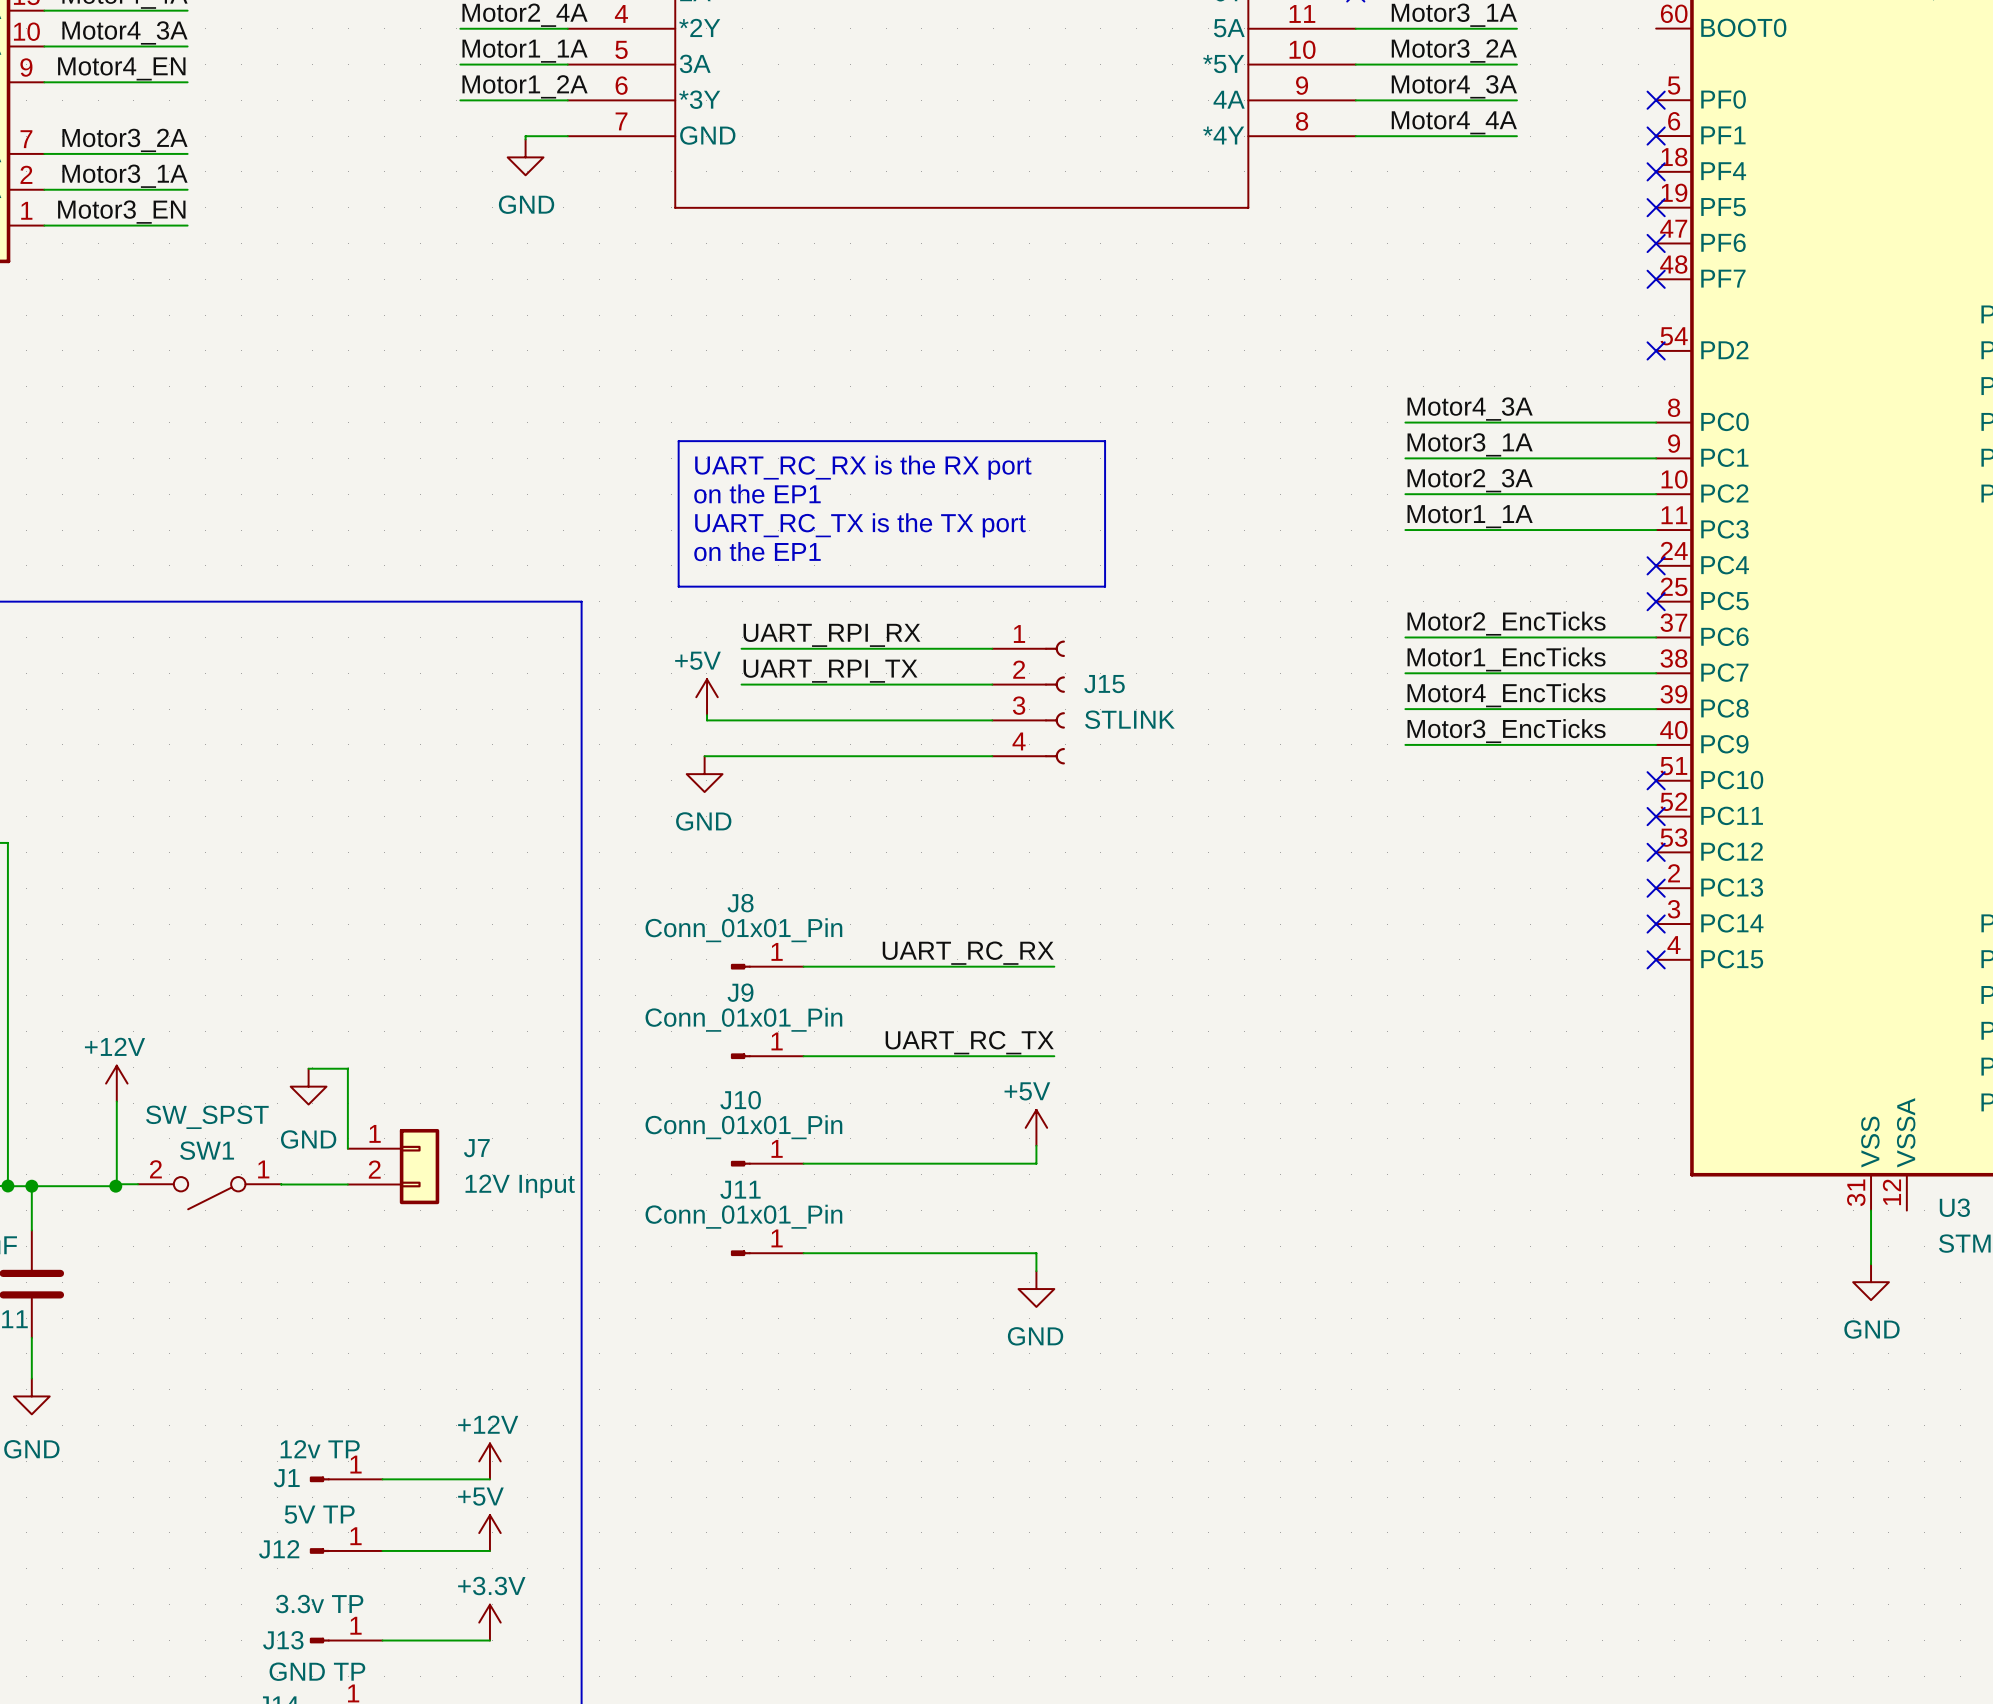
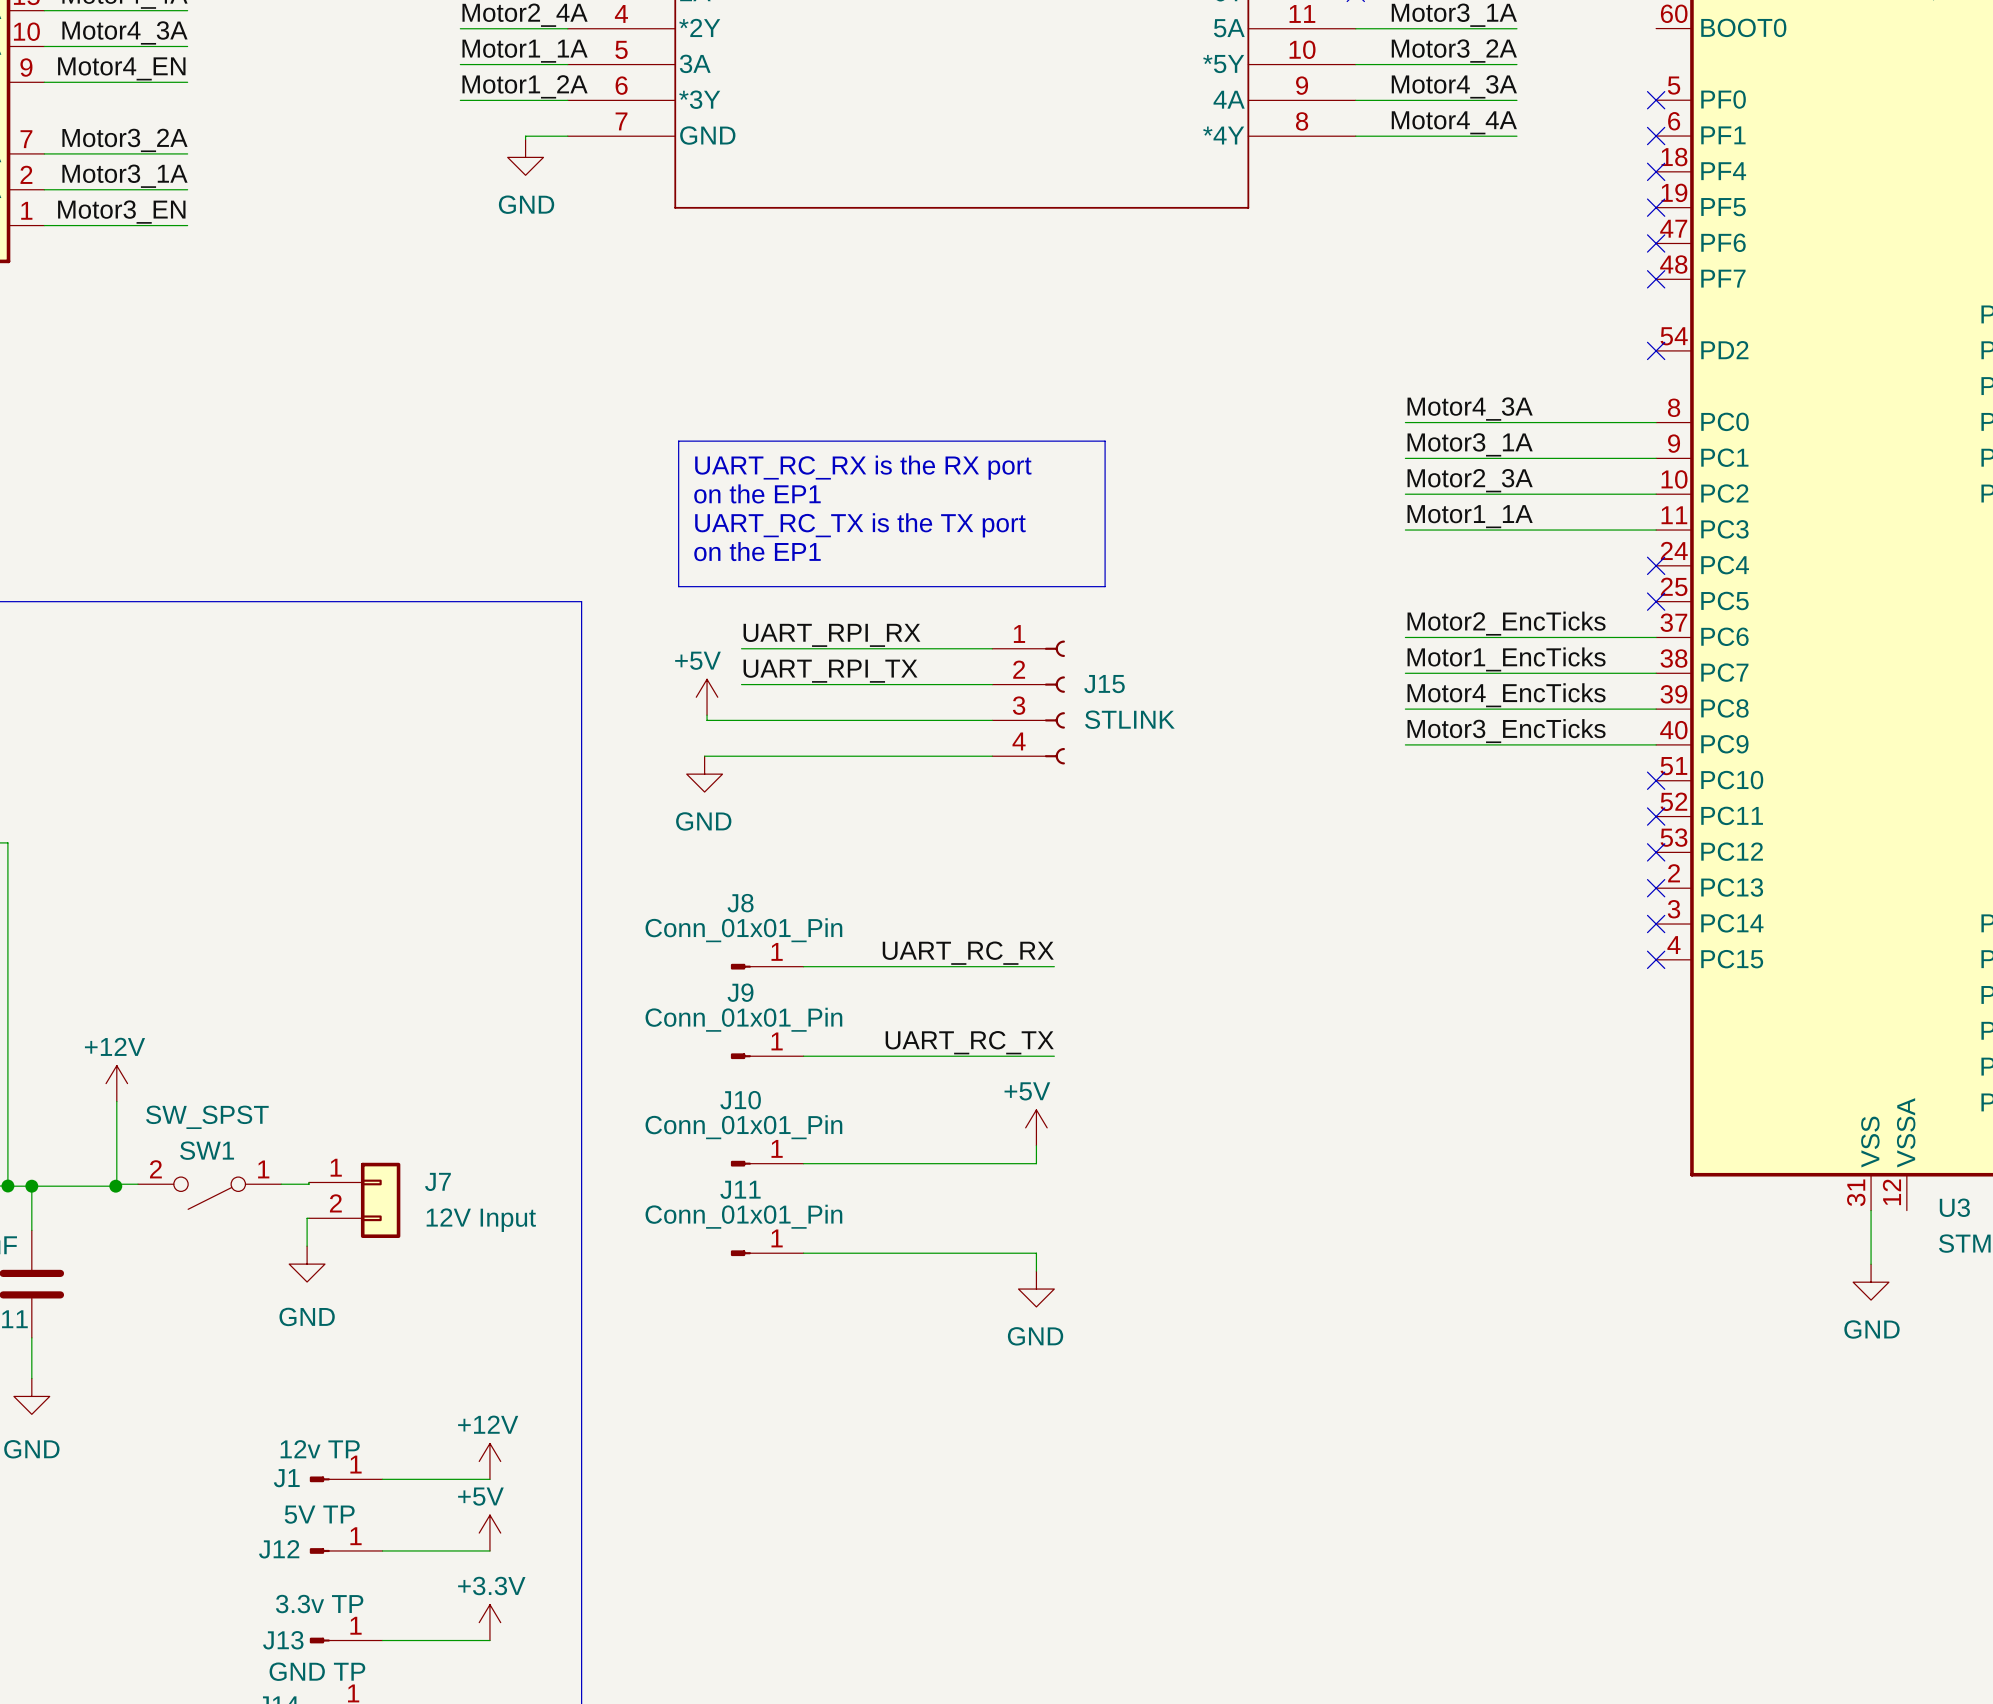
wire: (308, 1068) (347, 1068) (347, 1148) -> none
power symbol position: GND (308, 1086) -> GND (307, 1264)
J7 position: (393, 1166) -> (354, 1200)
wire: (281, 1184) (347, 1184) -> (281, 1184) (309, 1184) (309, 1182)
wire: none -> (309, 1218) (307, 1218) (307, 1246)

